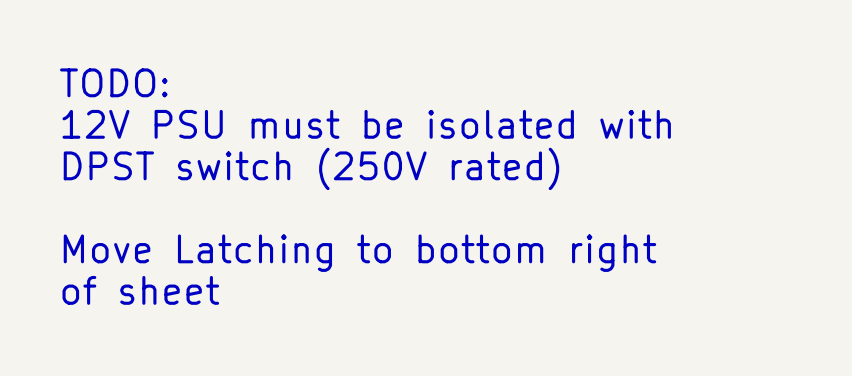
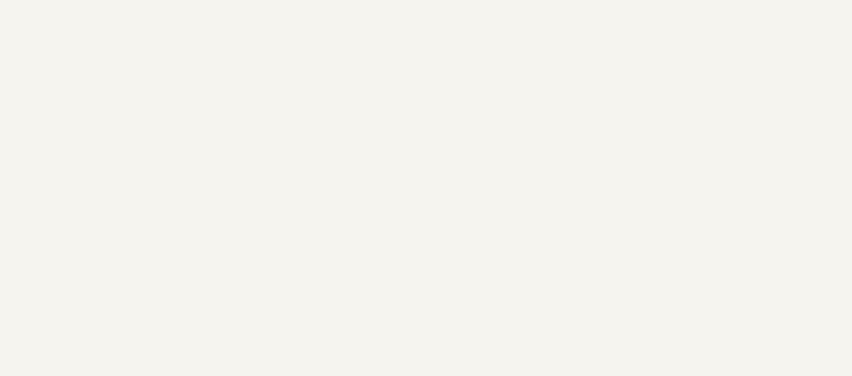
text: TODO: (113, 82) -> none
text: 12V PSU must be isolated with (366, 124) -> none
text: DPST switch (250V rated) (311, 168) -> none
text: Move Latching to bottom right (359, 253) -> none
text: of sheet (140, 290) -> none

